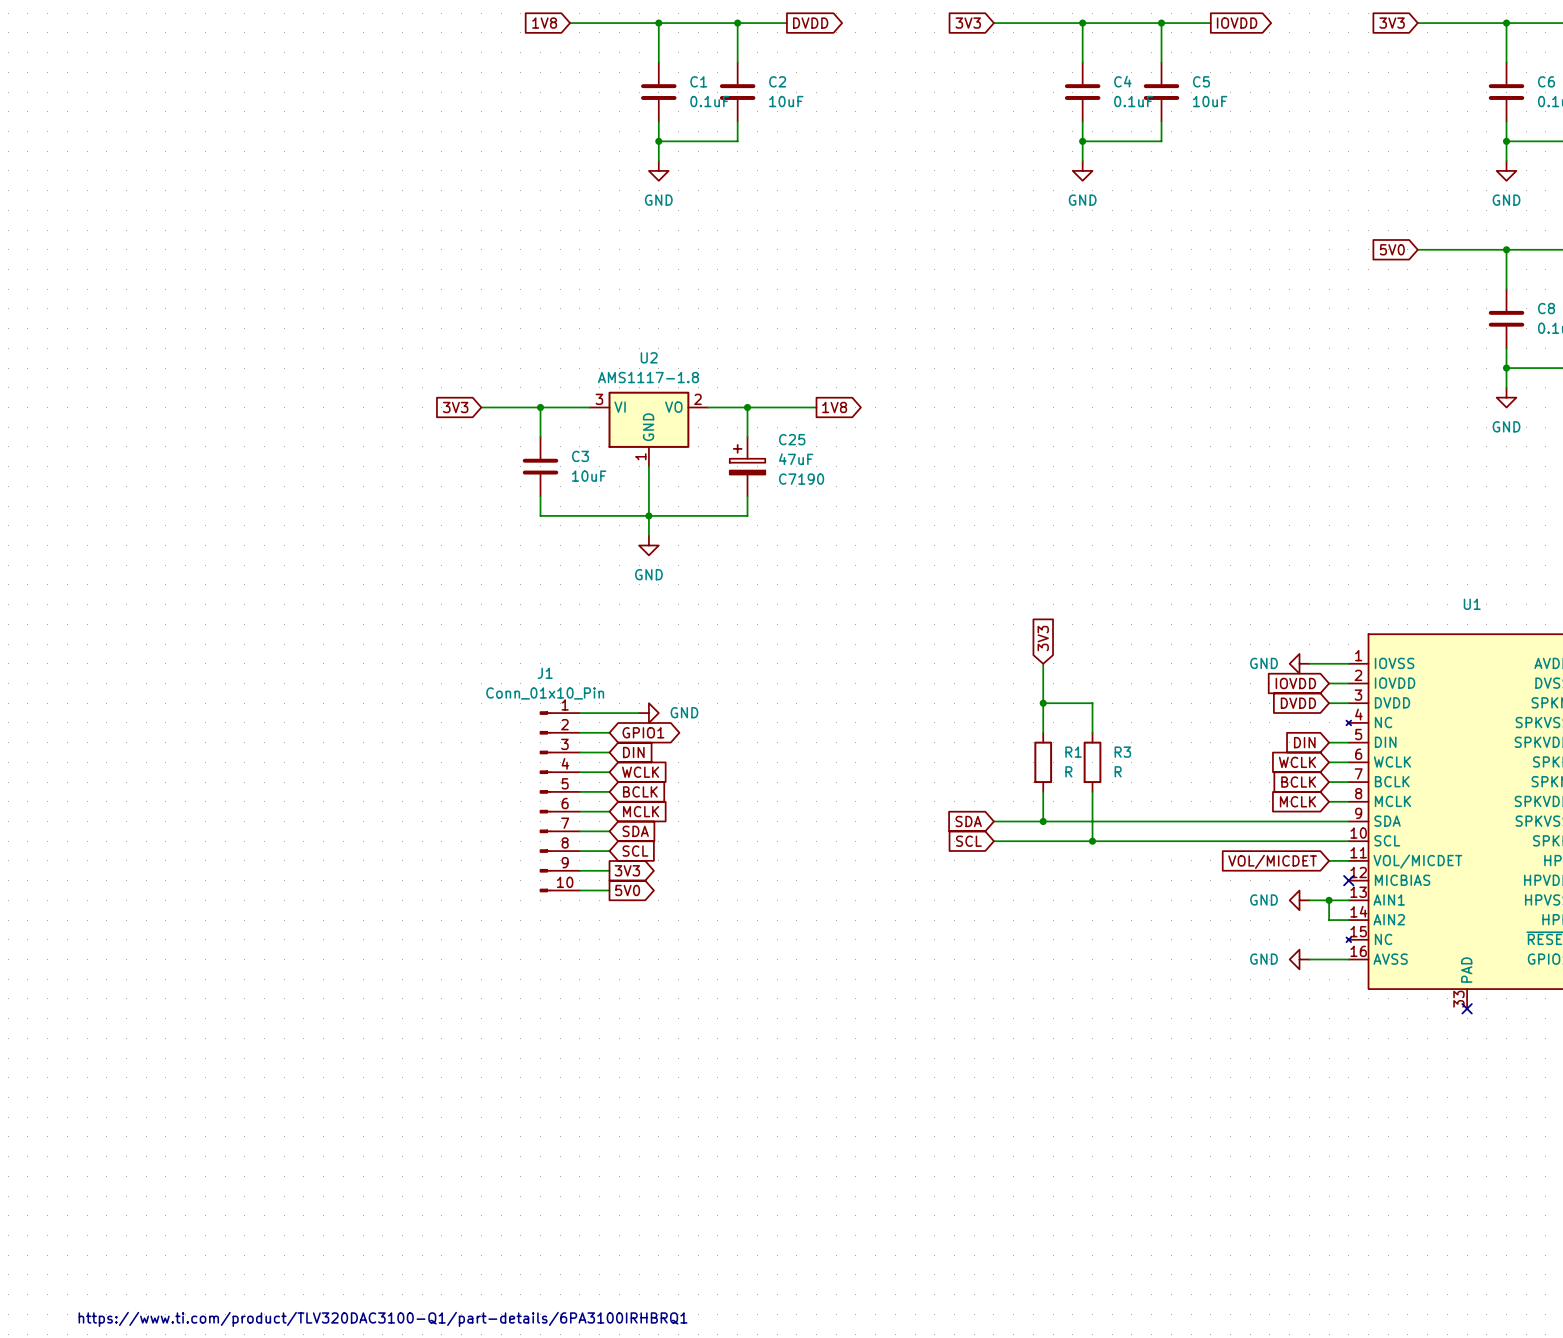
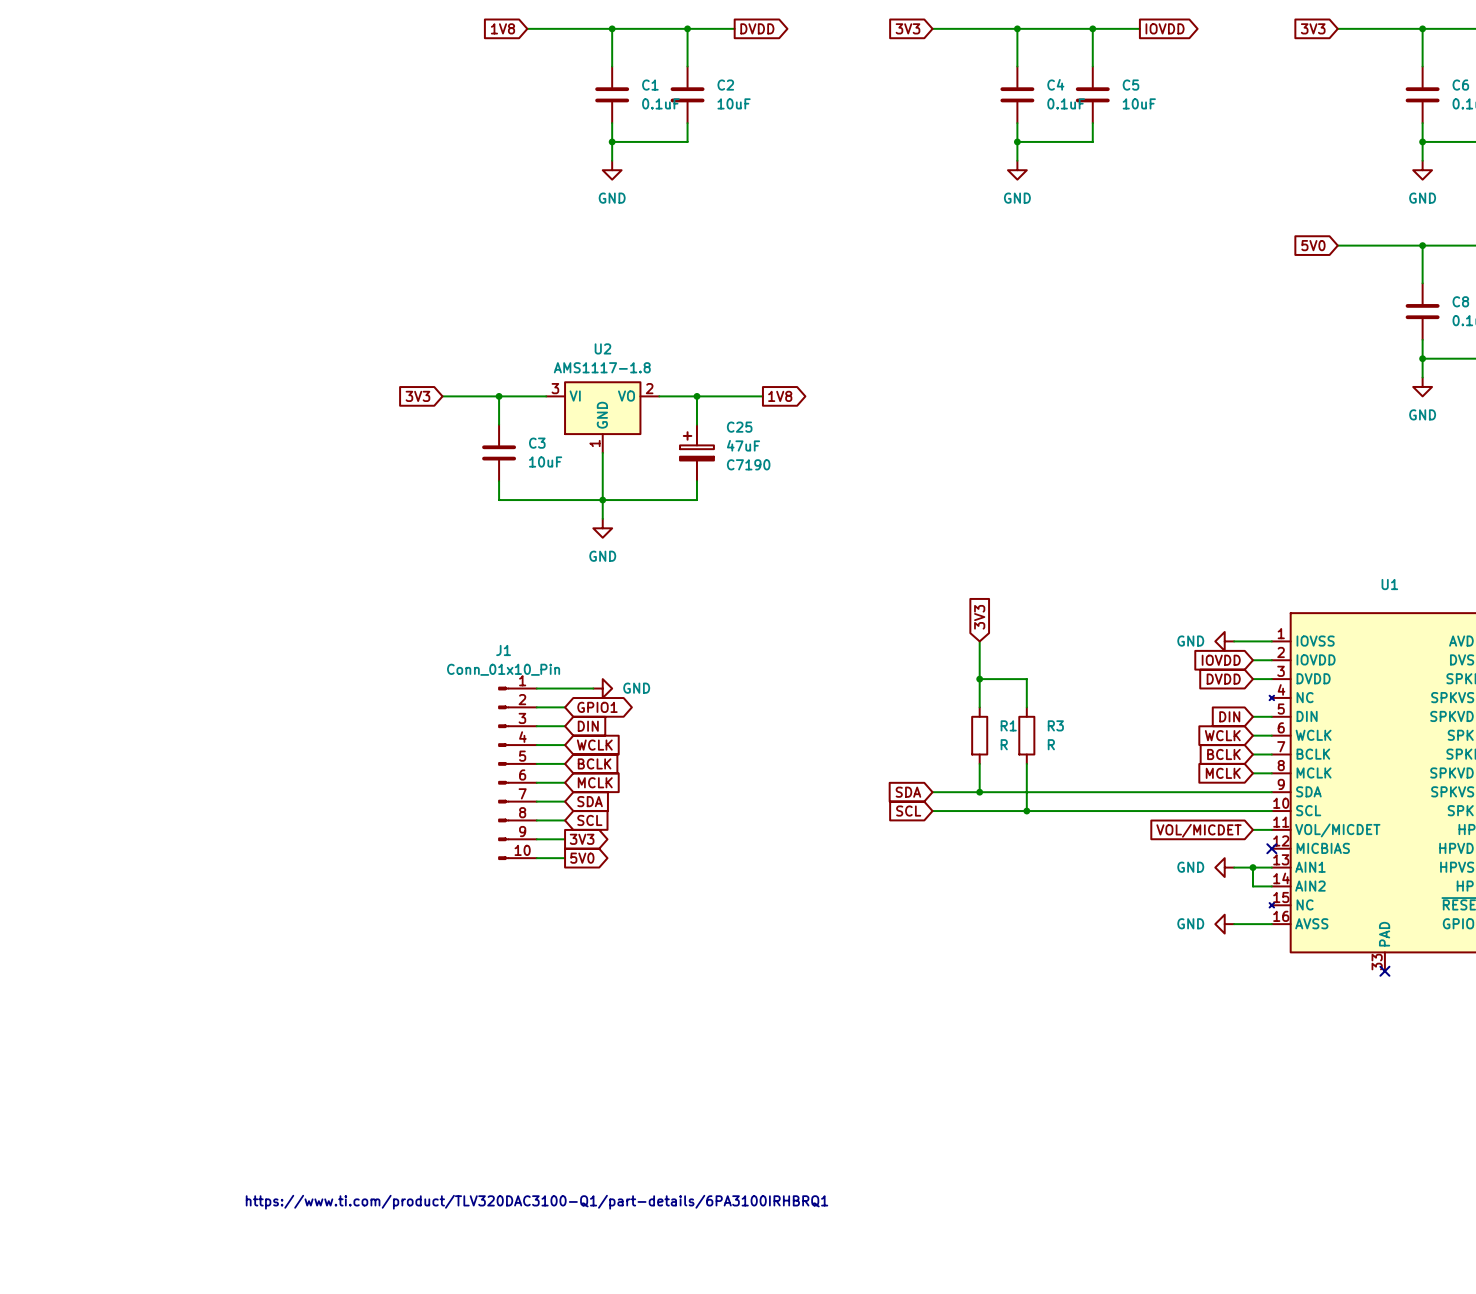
text: none -> https://www.ti.com/product/TLV320DAC3100-Q1/part-details/6PA3100IRHBRQ1 (537, 1202)
text: https://www.ti.com/product/TLV320DAC3100-Q1/part-details/6PA3100IRHBRQ1 (383, 1319) -> none

